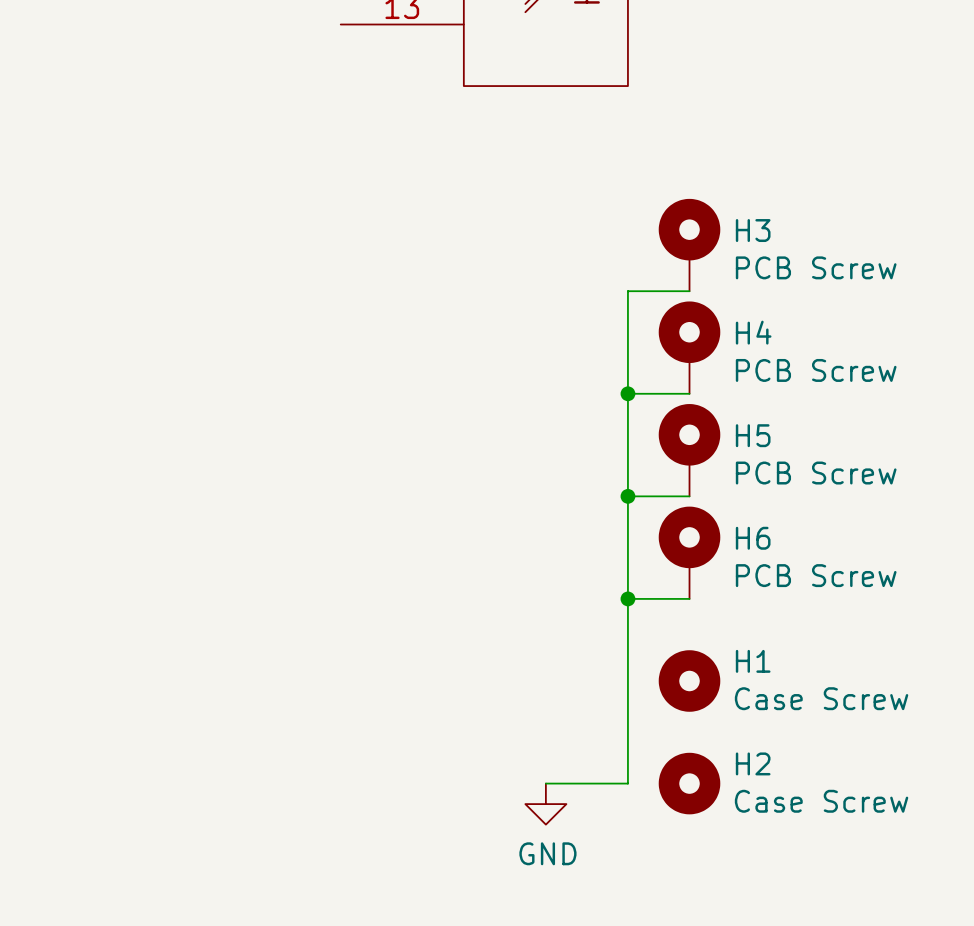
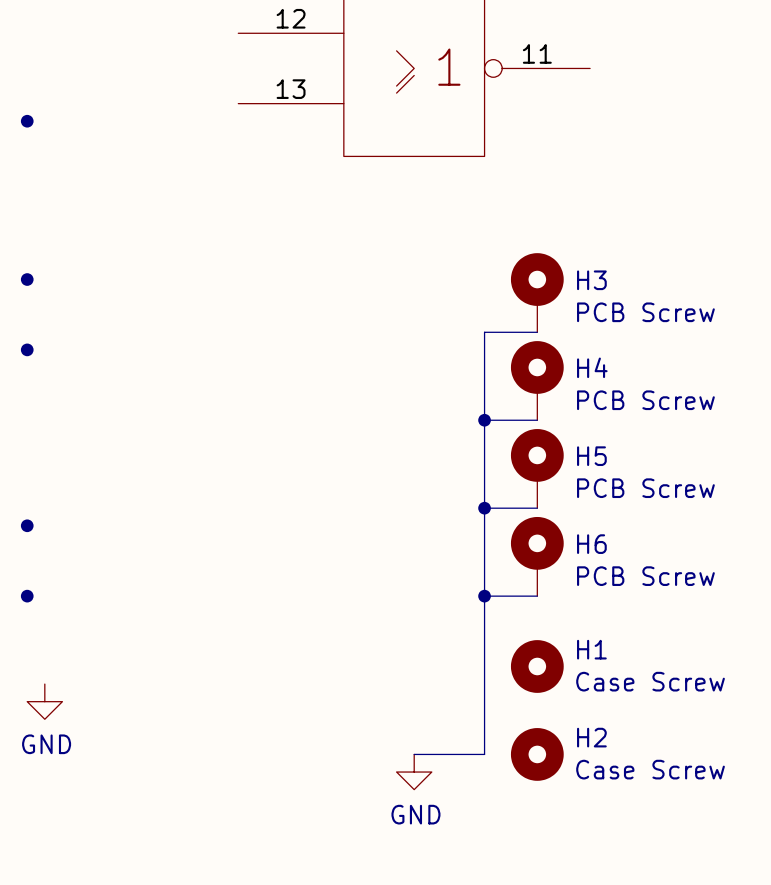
junction: none -> (27, 121)
junction: none -> (27, 279)
junction: none -> (27, 349)
junction: none -> (27, 525)
junction: none -> (27, 596)
power symbol: none -> GND (44, 701)

